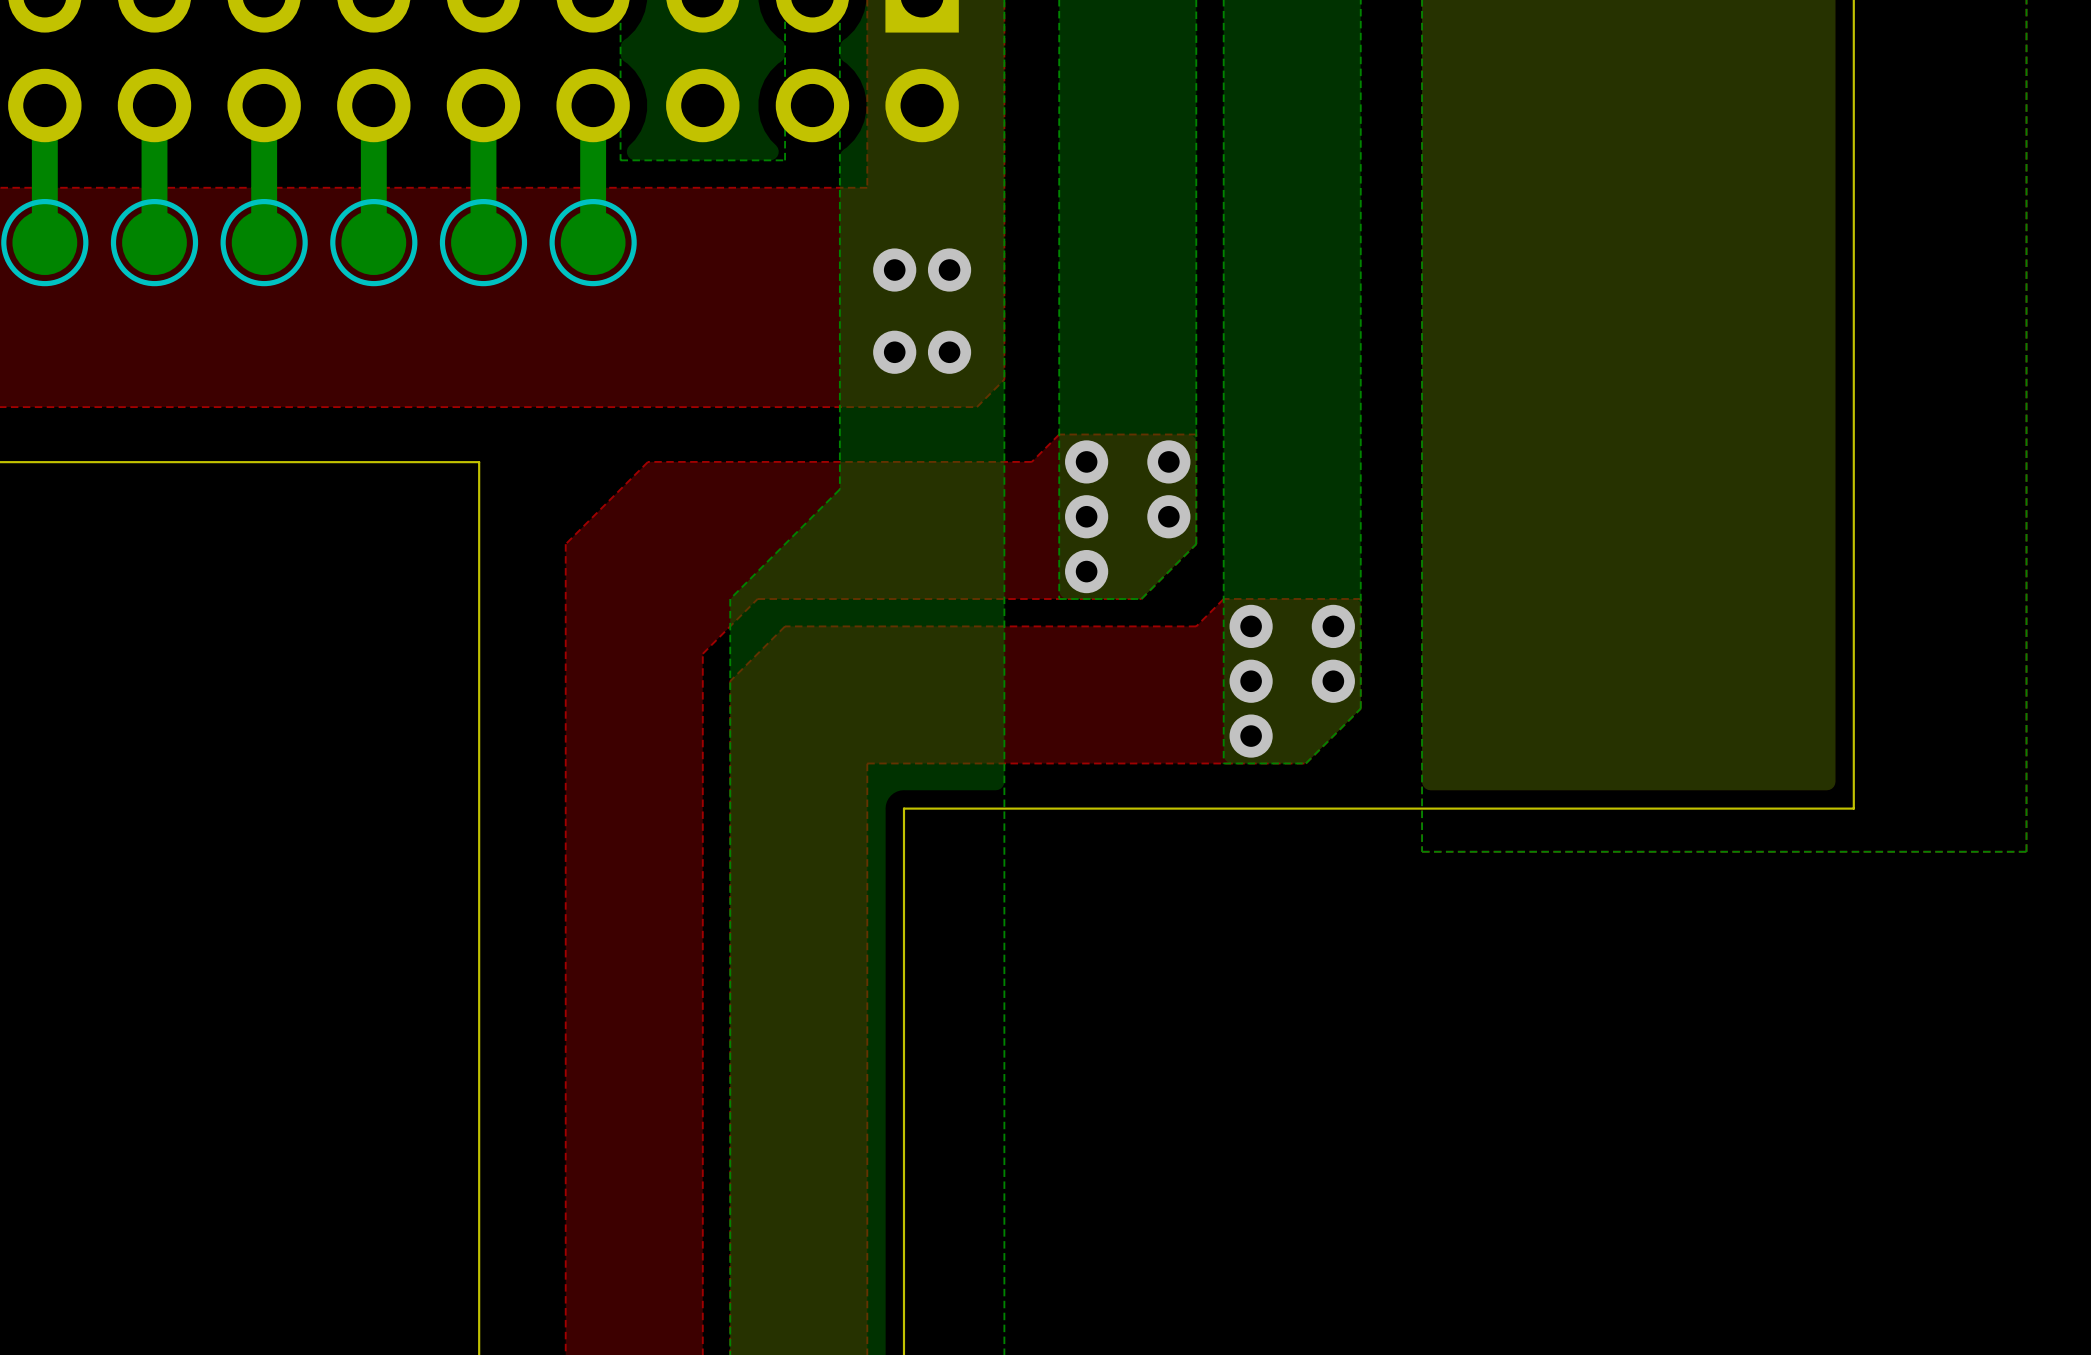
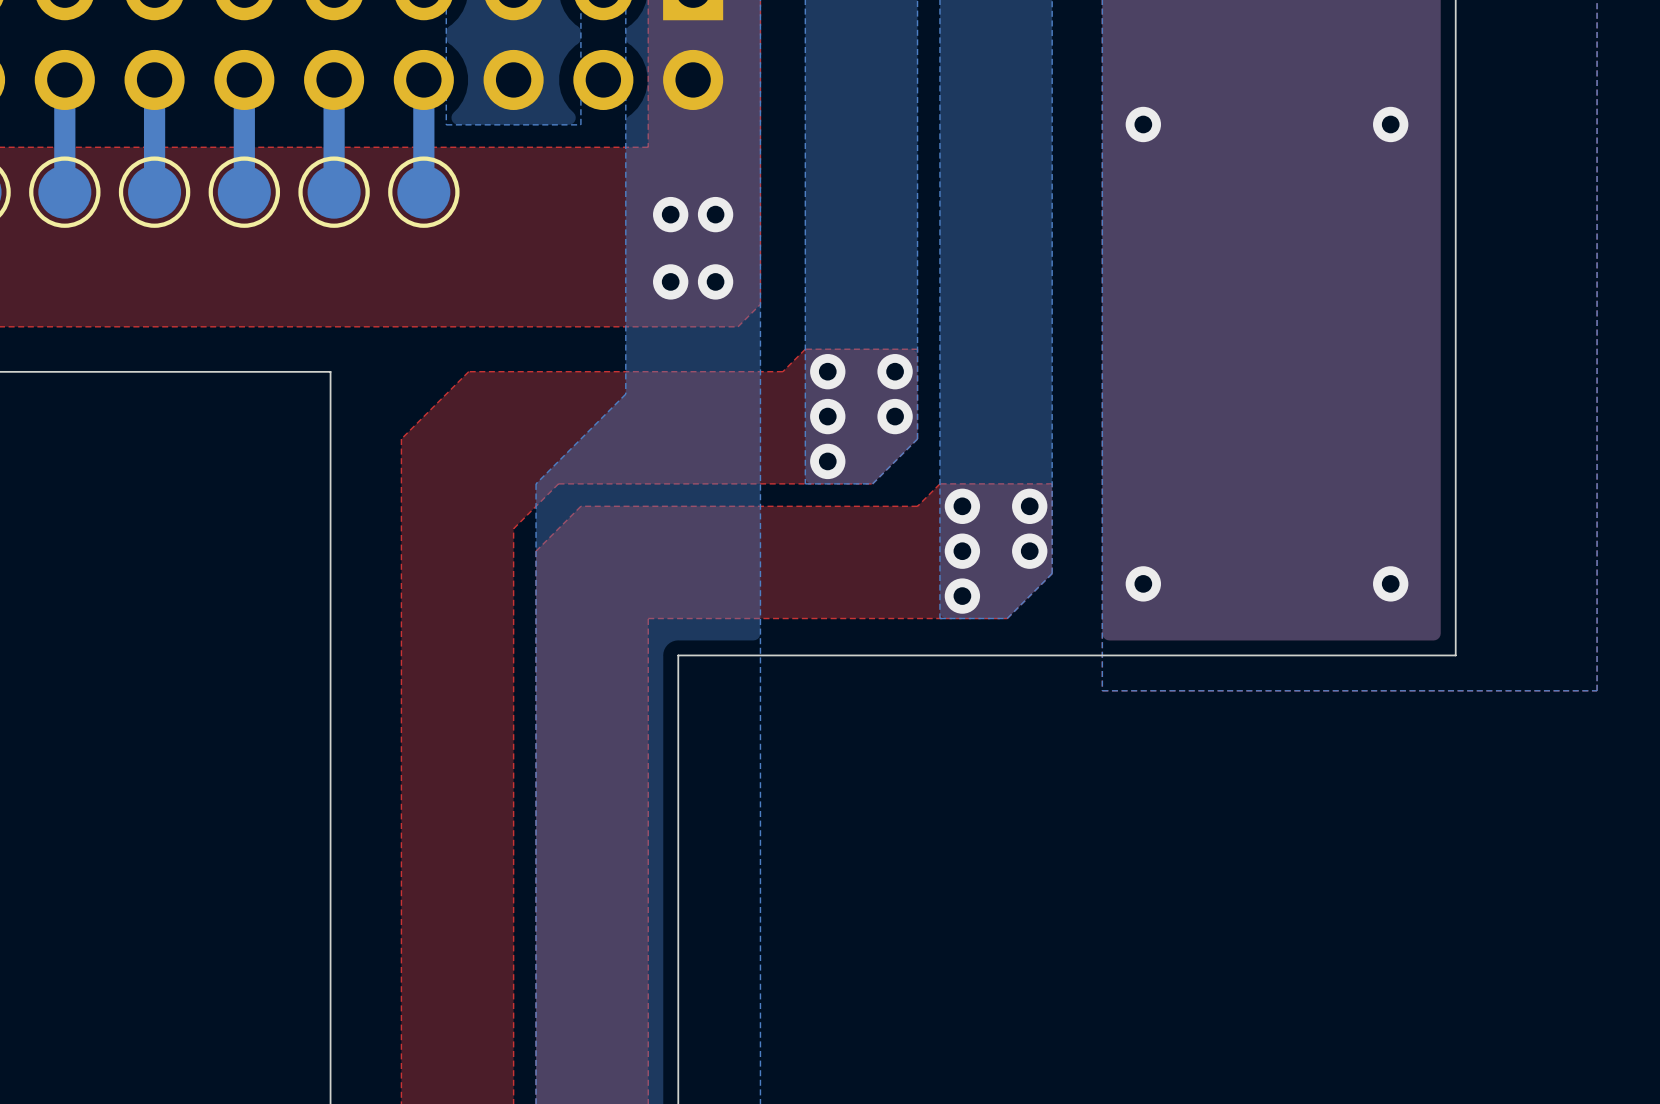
via: none -> (1143, 124)
via: none -> (1390, 124)
via: none -> (1143, 583)
via: none -> (1390, 583)

